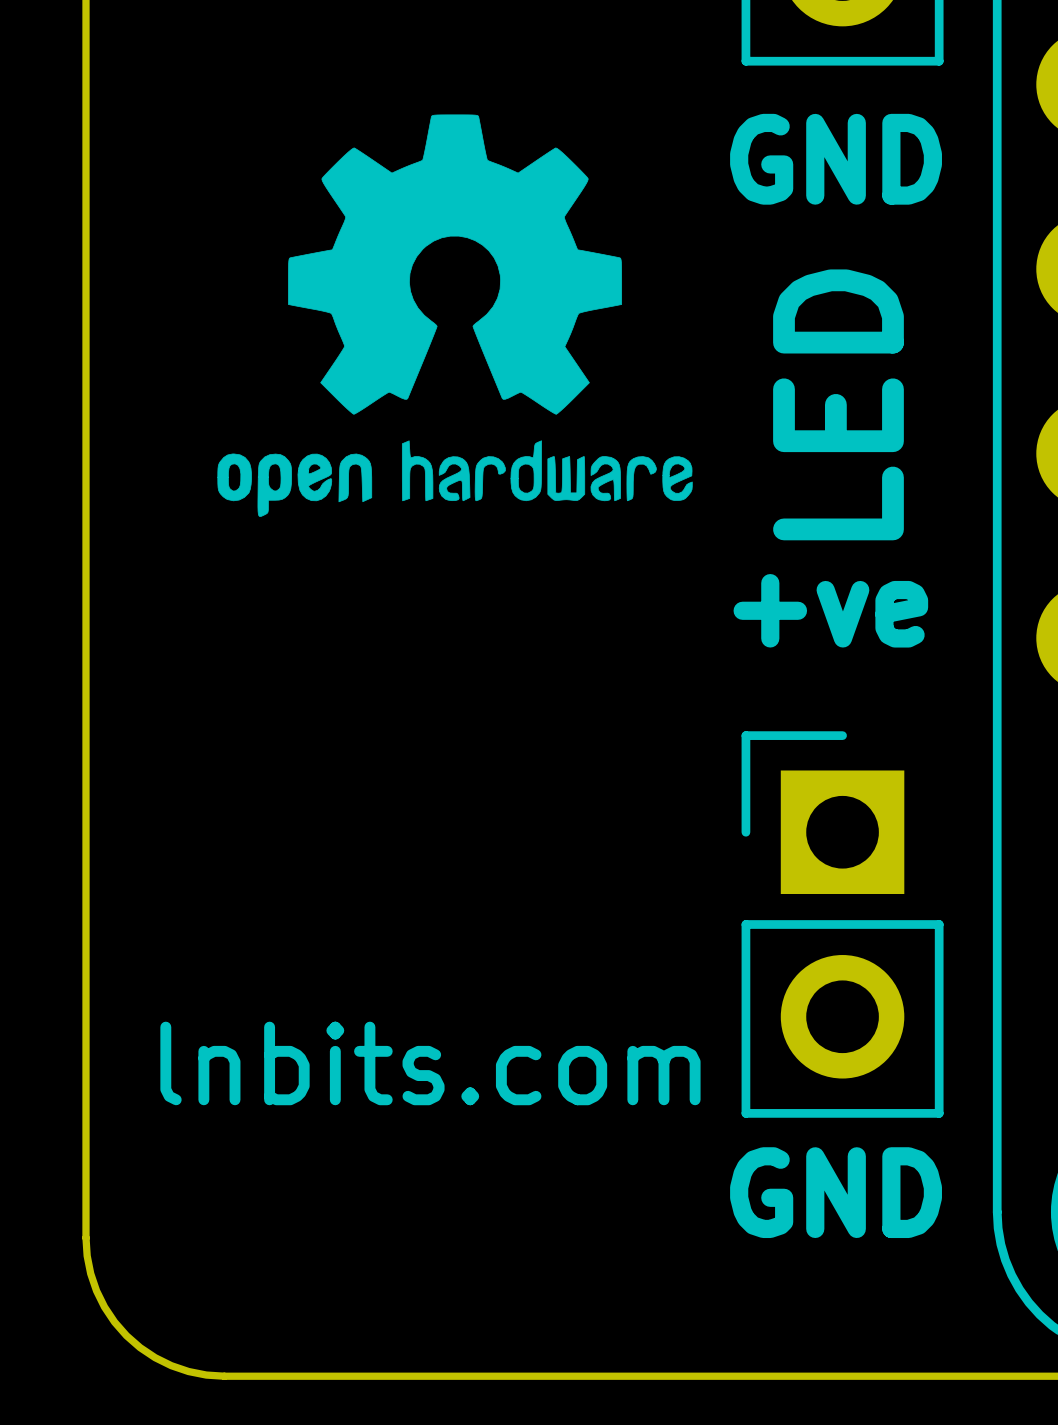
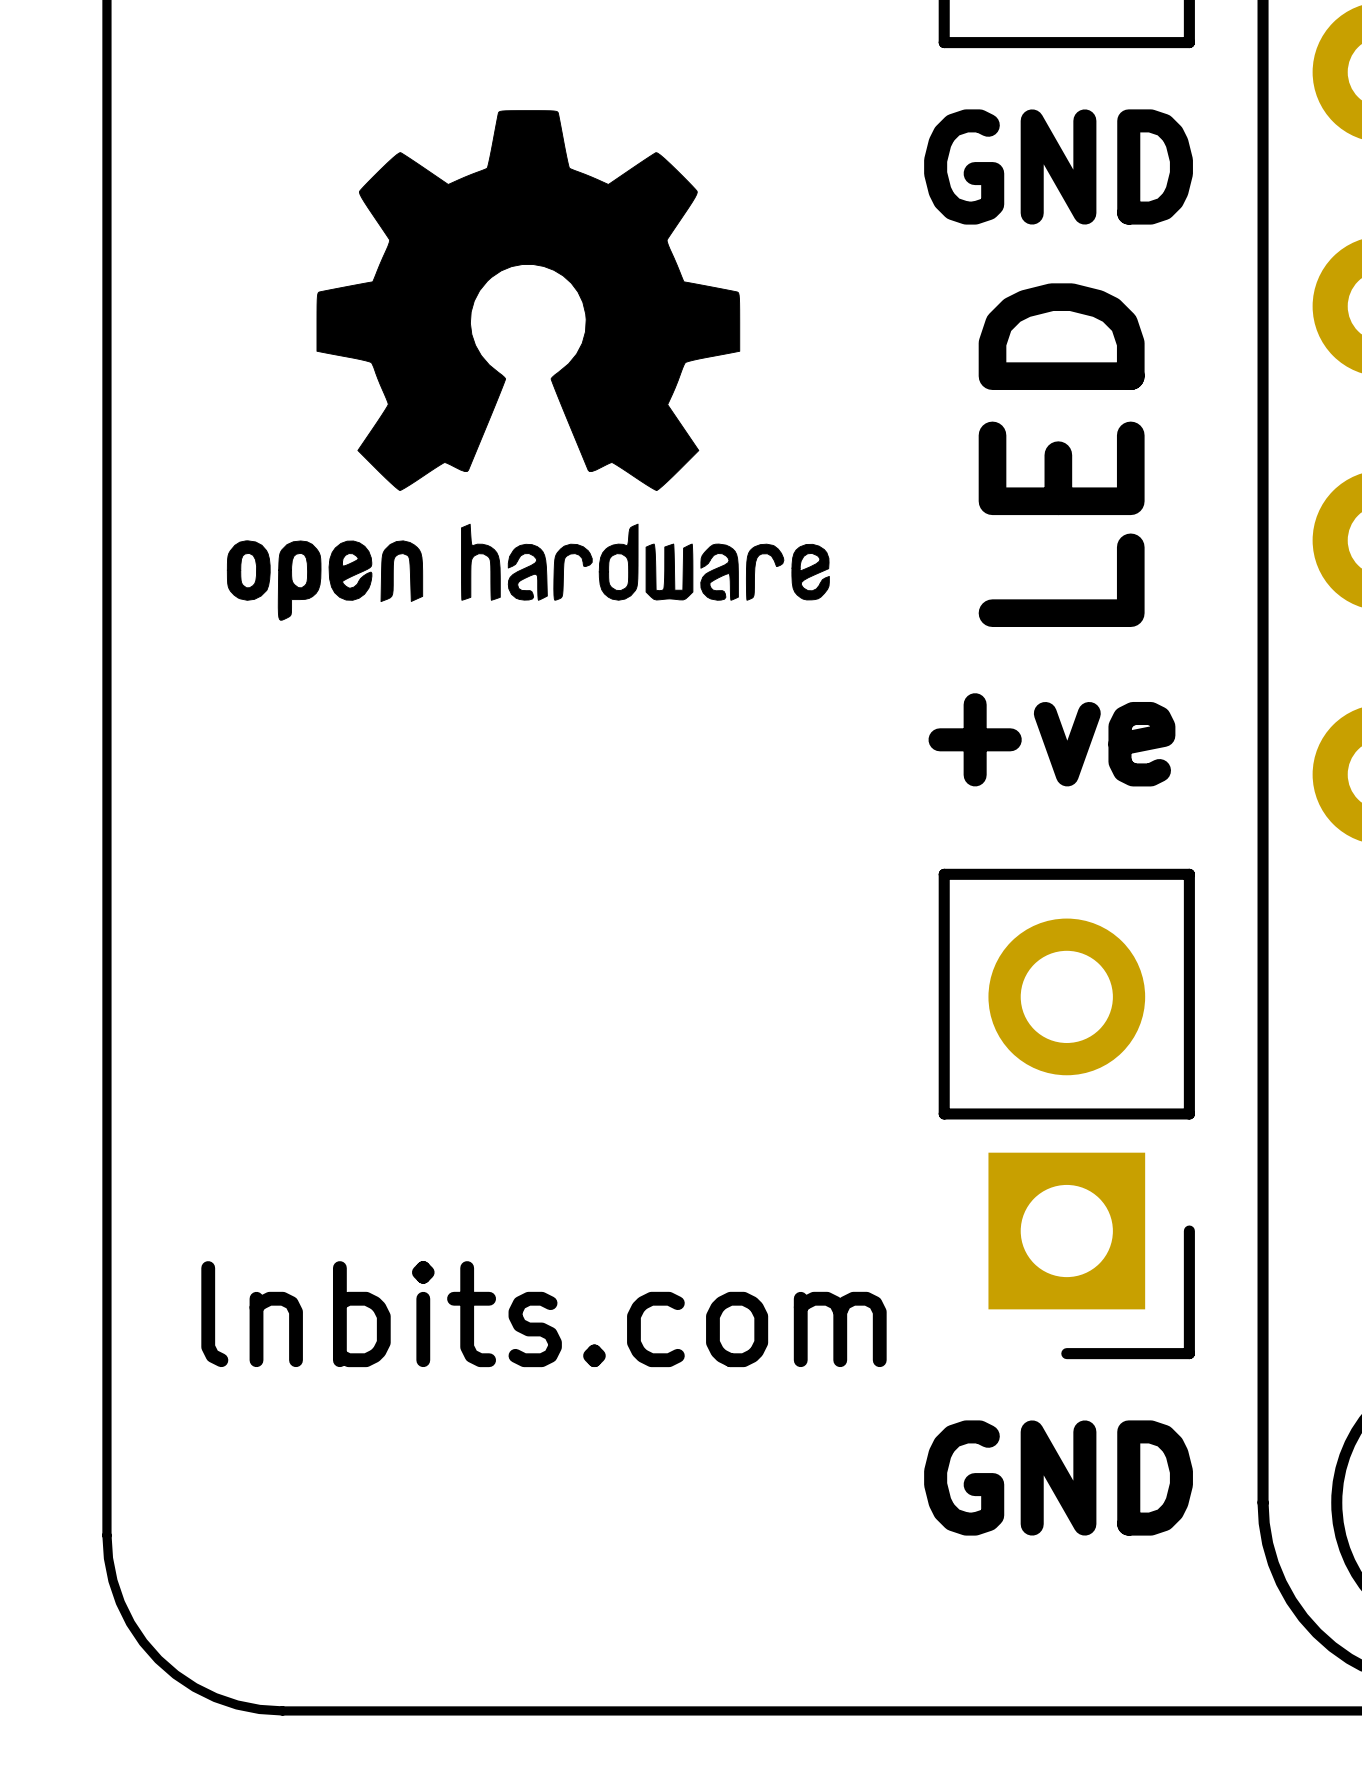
drawing position: (455, 315) -> (528, 365)
part rotation: 0° (842, 924) -> 180° (1066, 1113)

